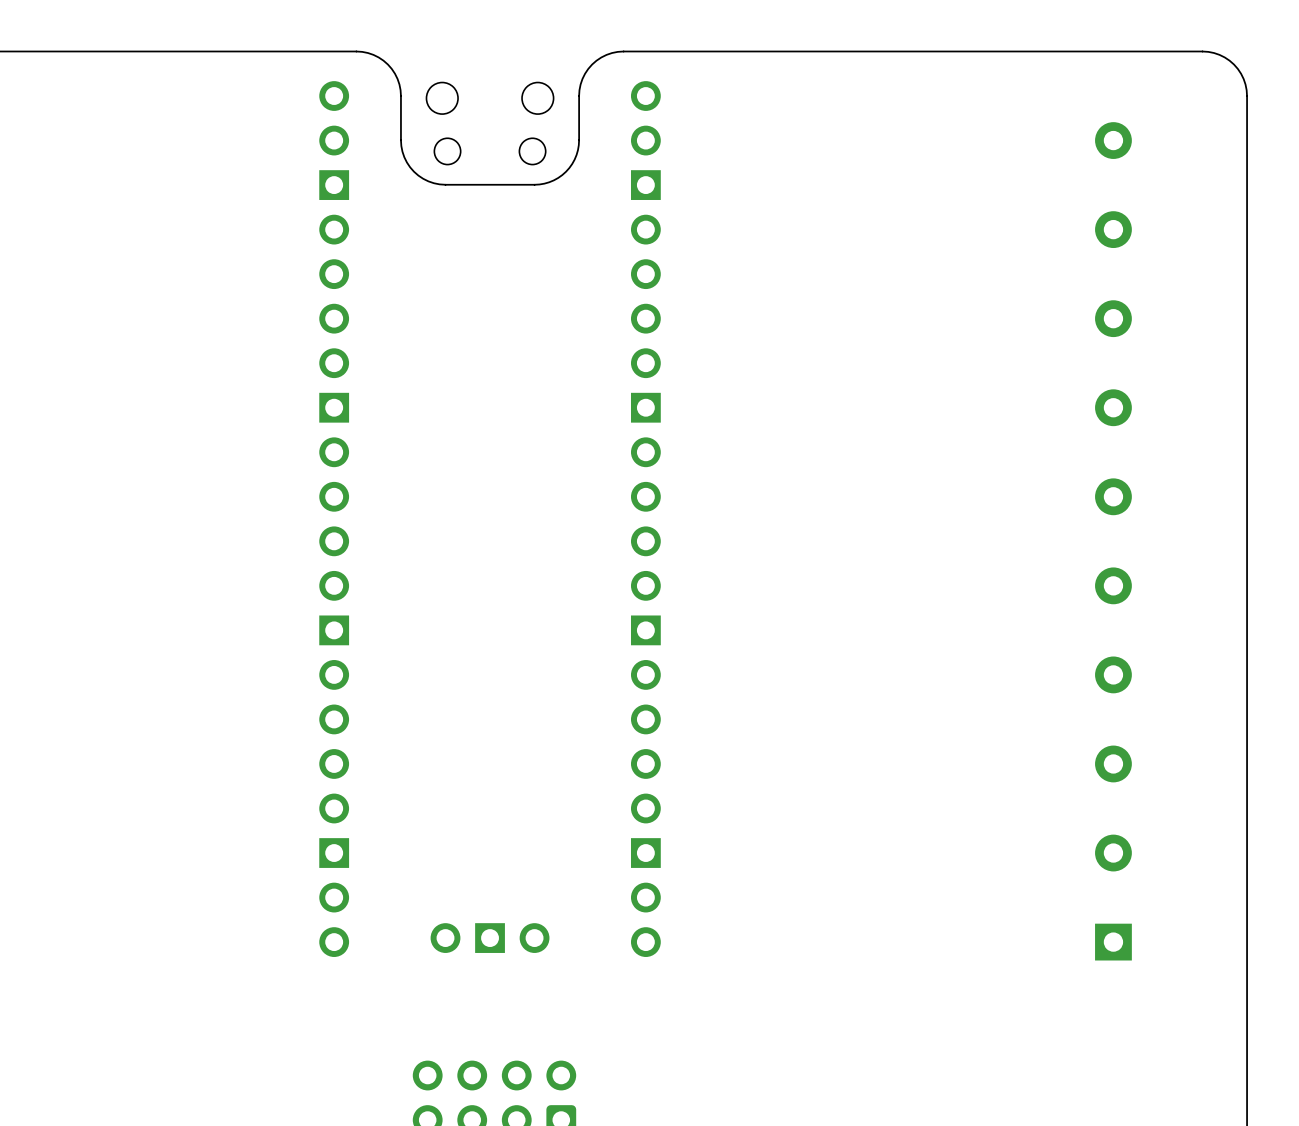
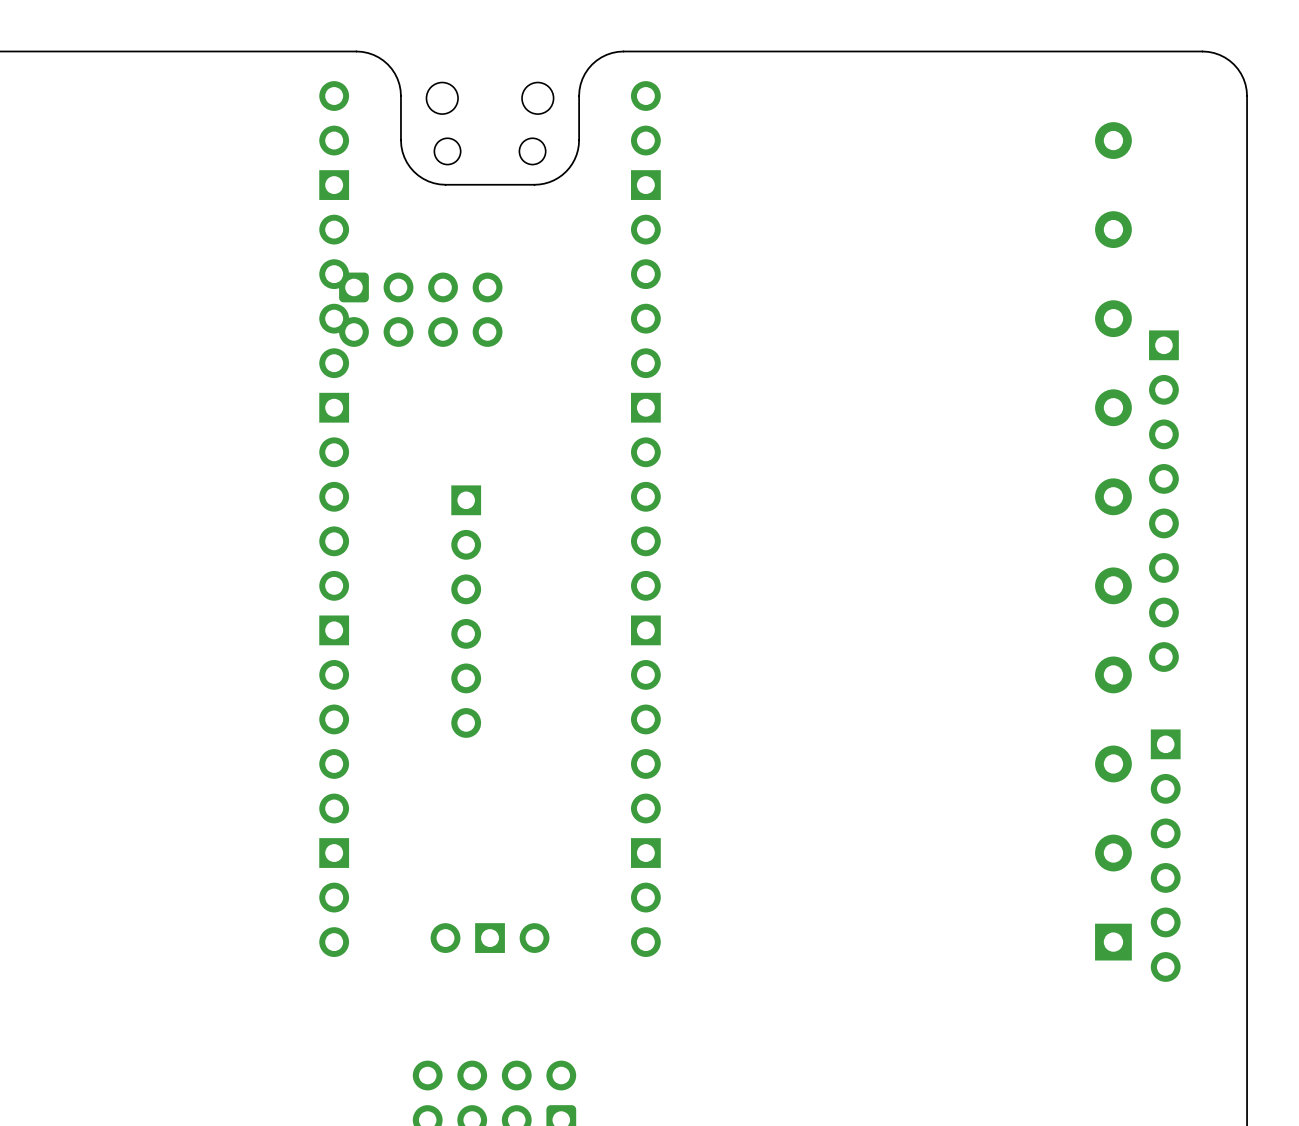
part: none -> (420, 309)
part: none -> (1163, 501)
part: none -> (466, 611)
part: none -> (1165, 855)

